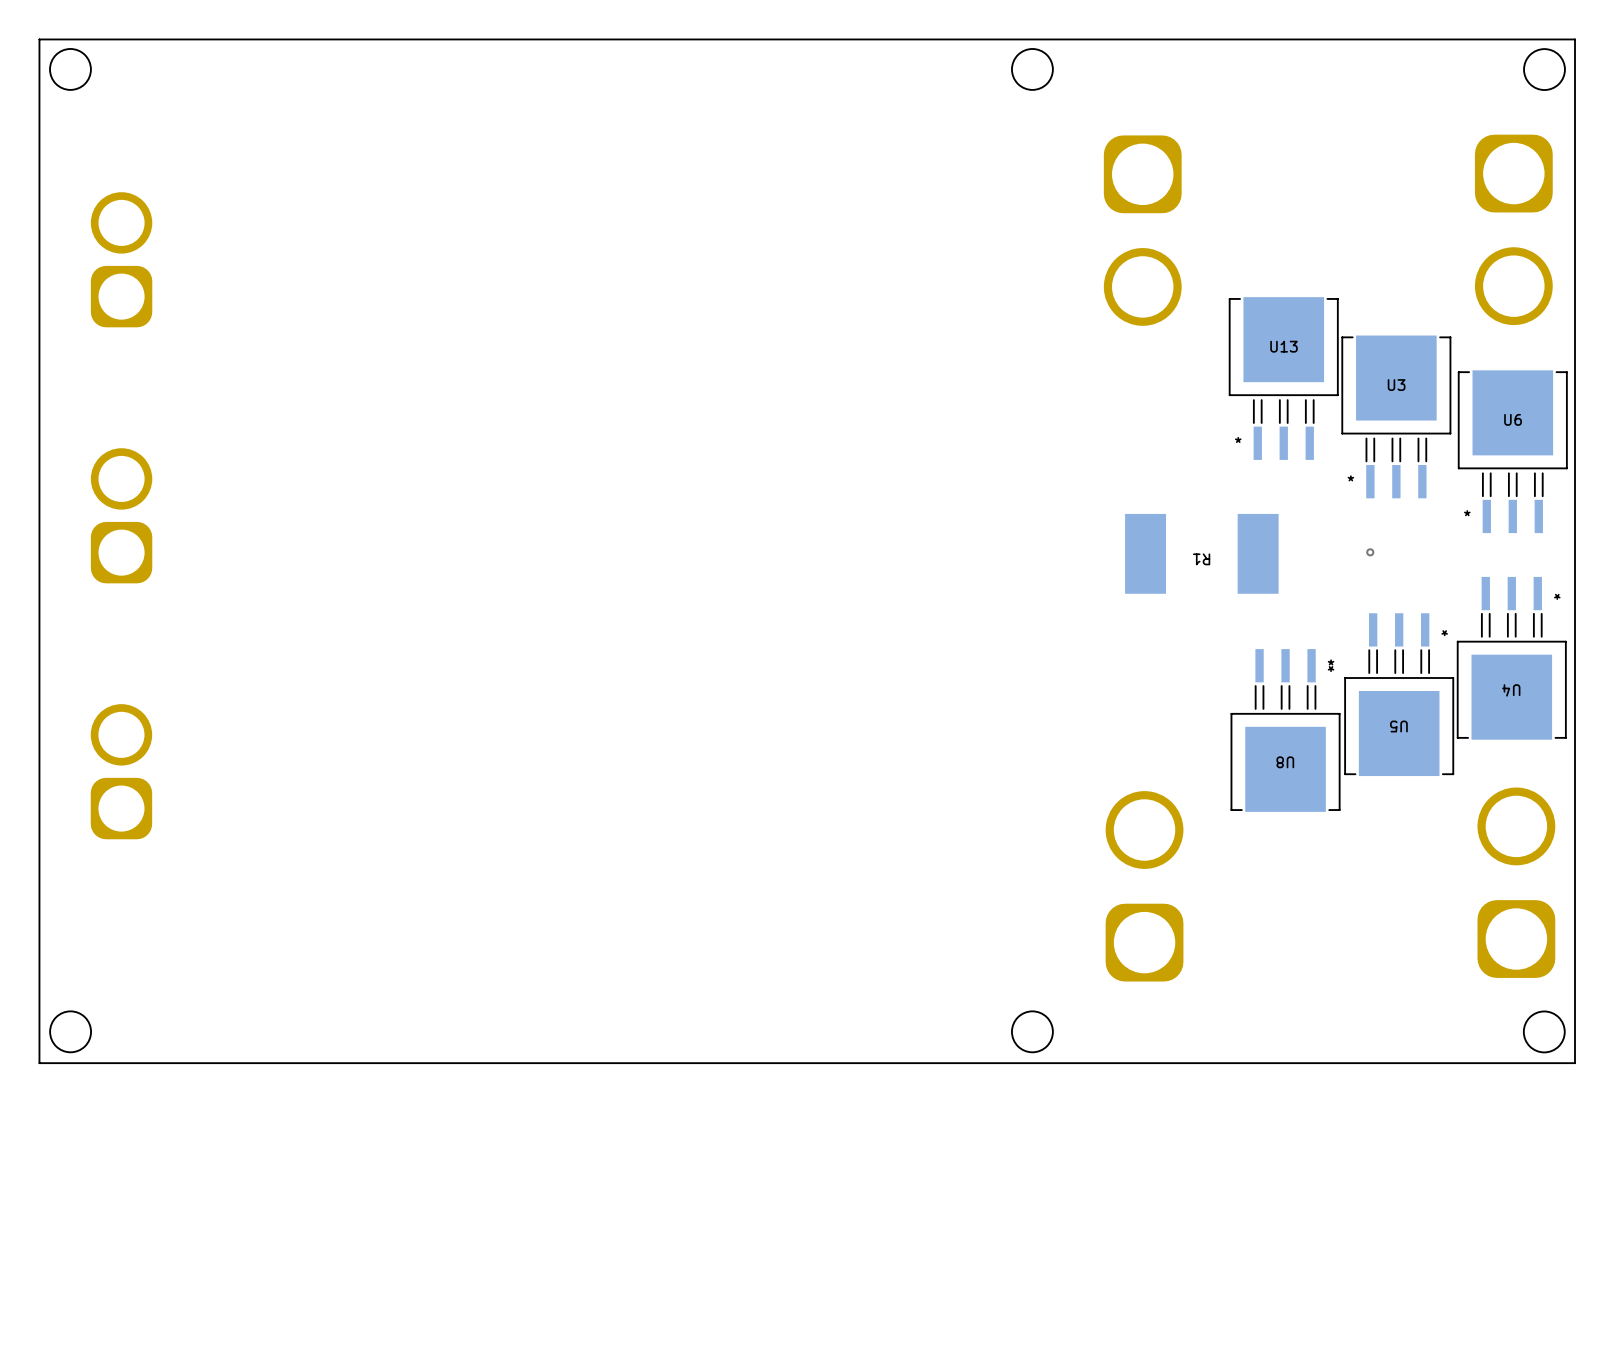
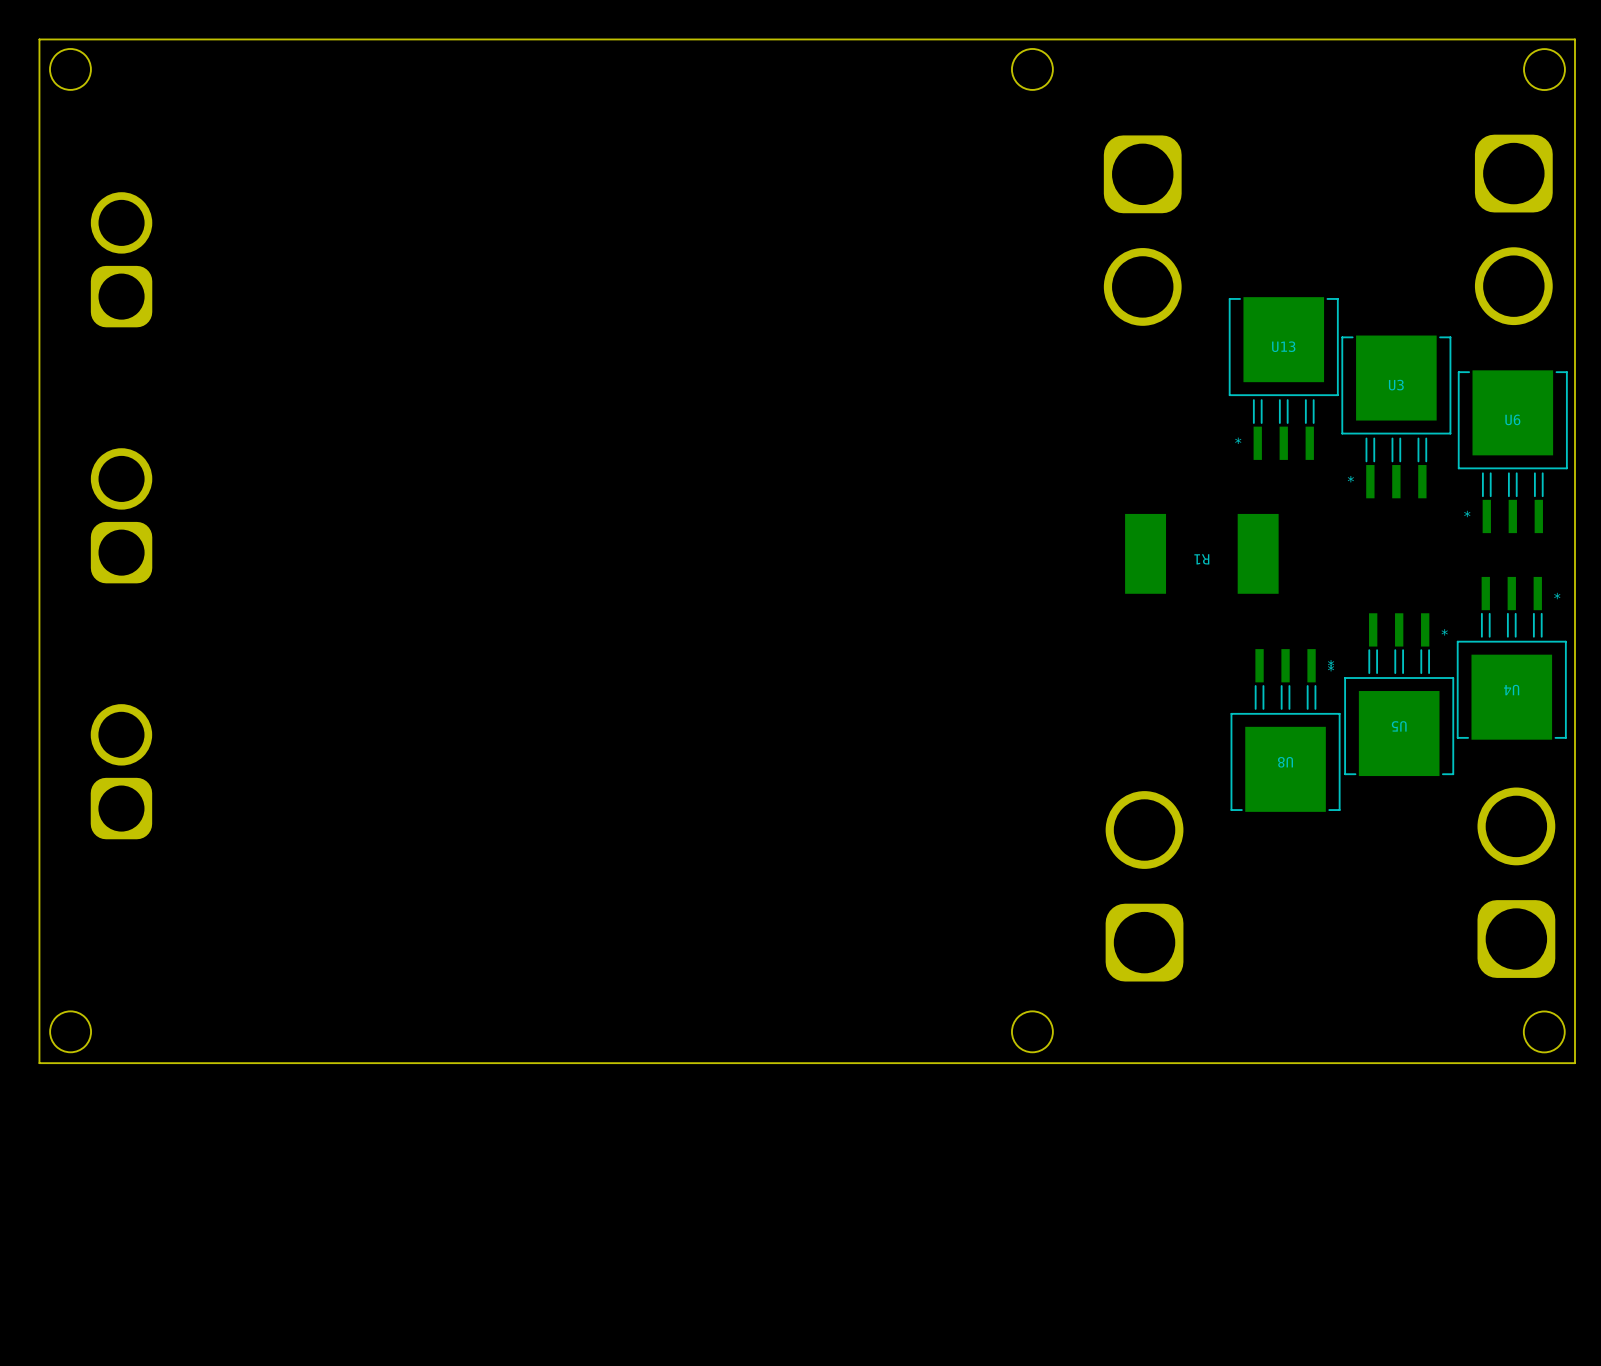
via: (1370, 552) -> none

